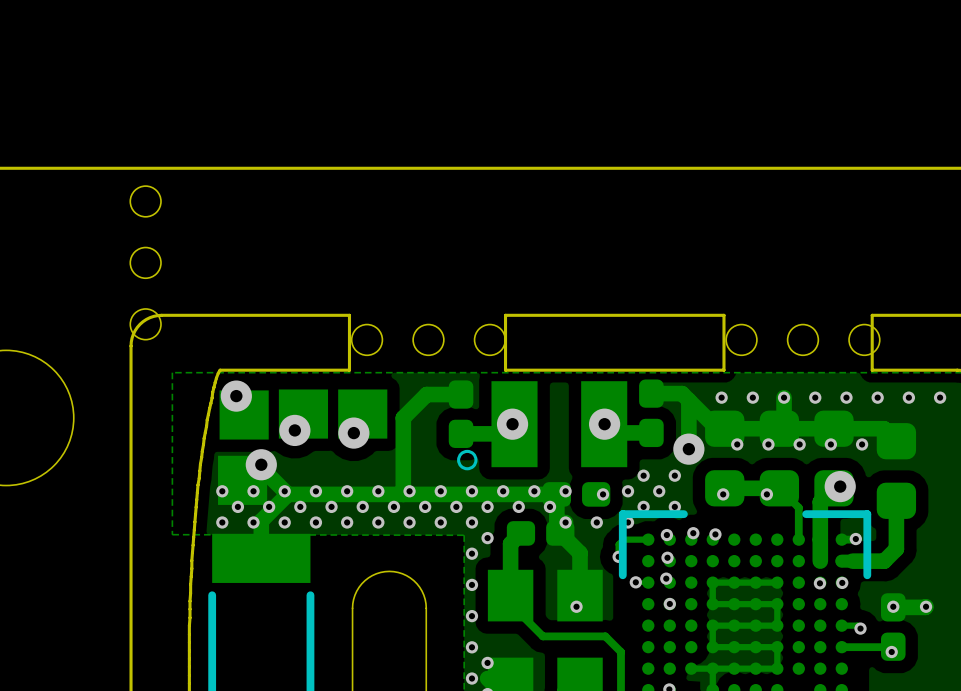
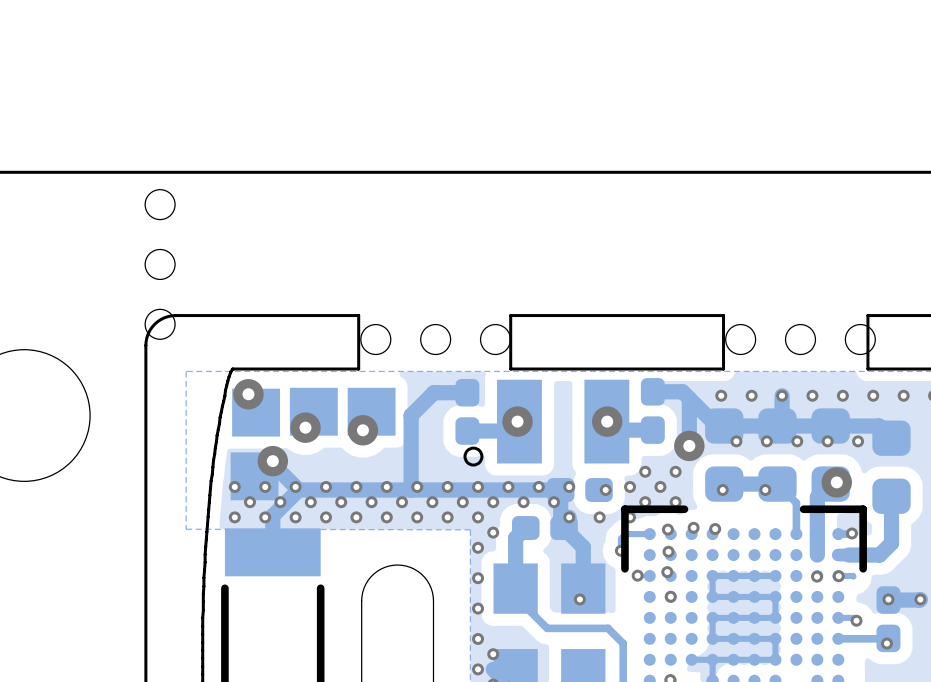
track: none -> (852, 575) (838, 575)

